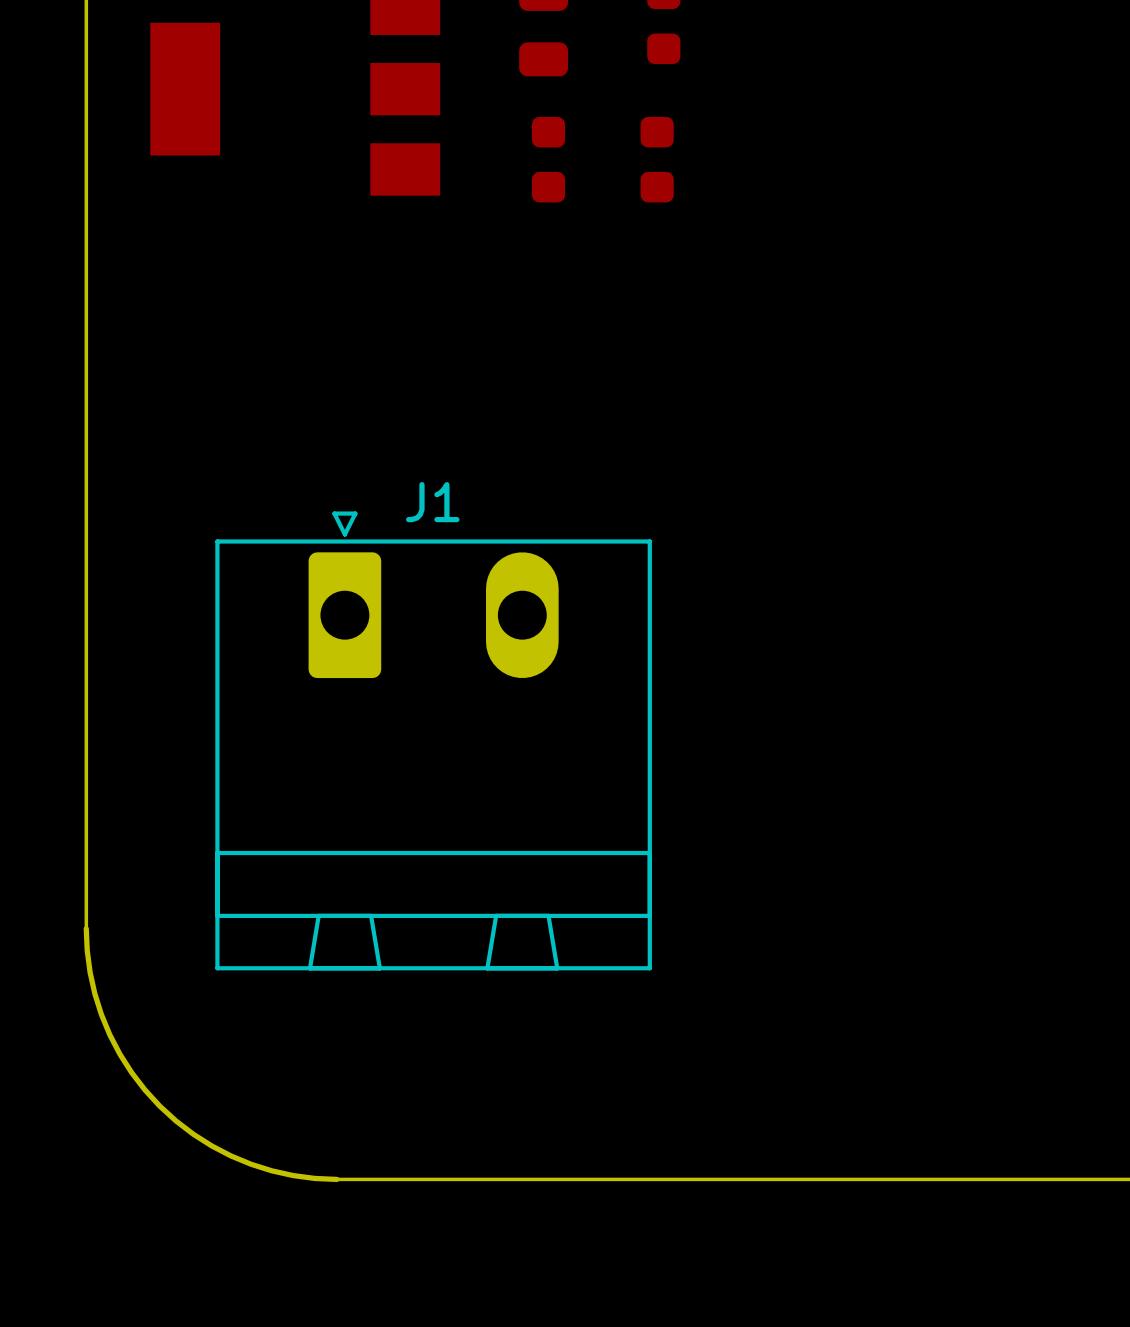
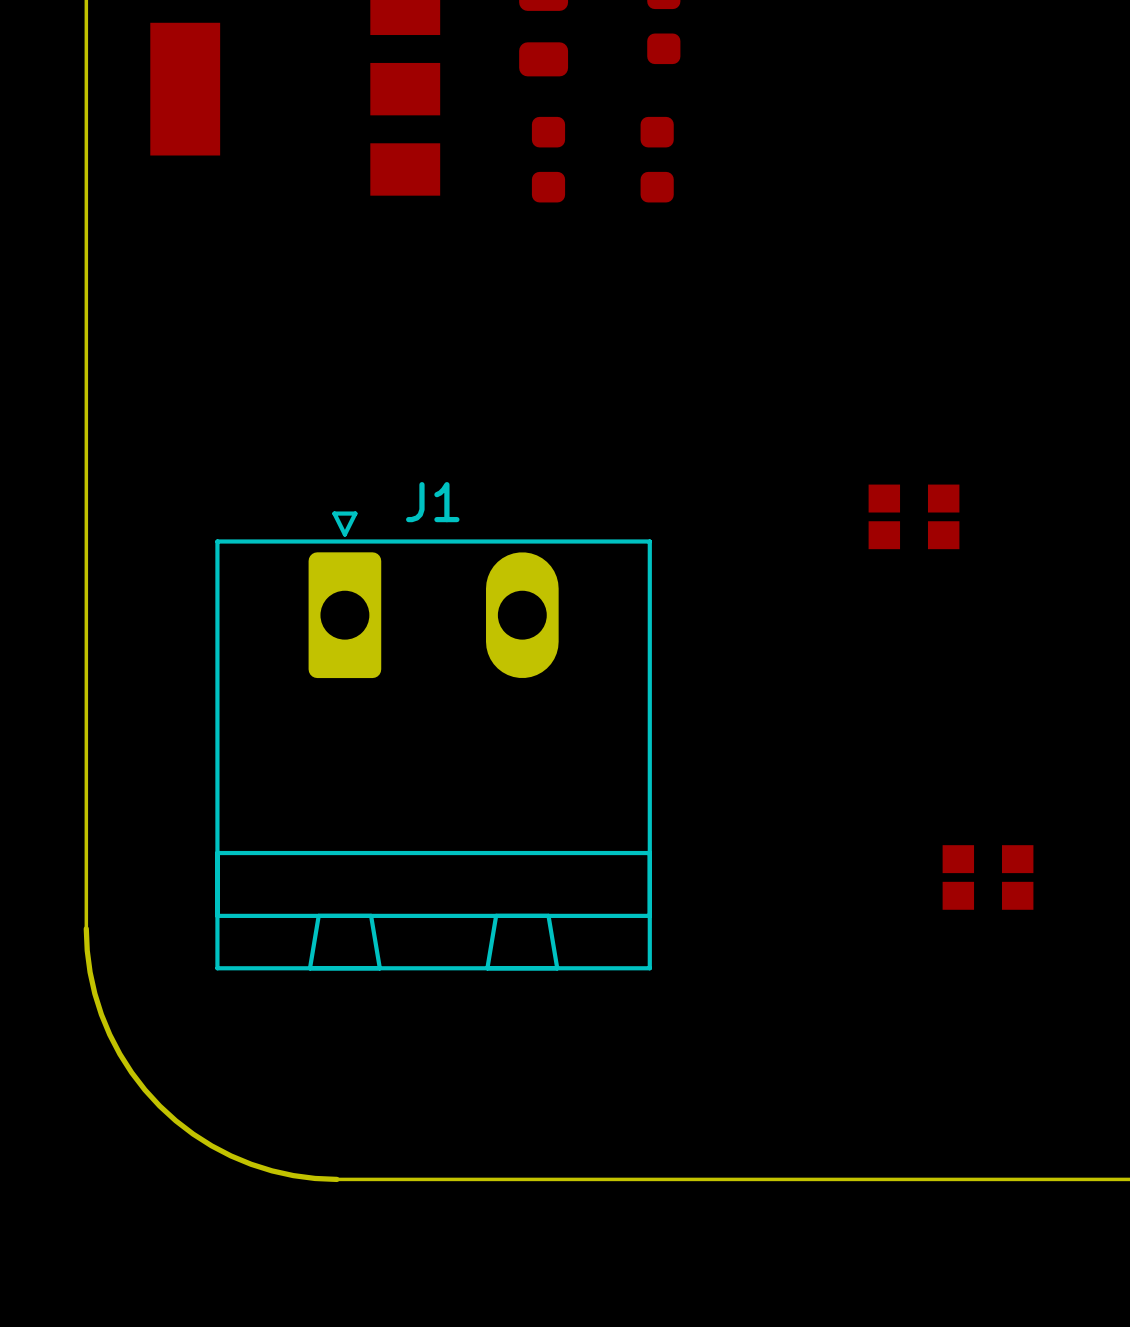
part: none -> (914, 516)
part: none -> (988, 877)

